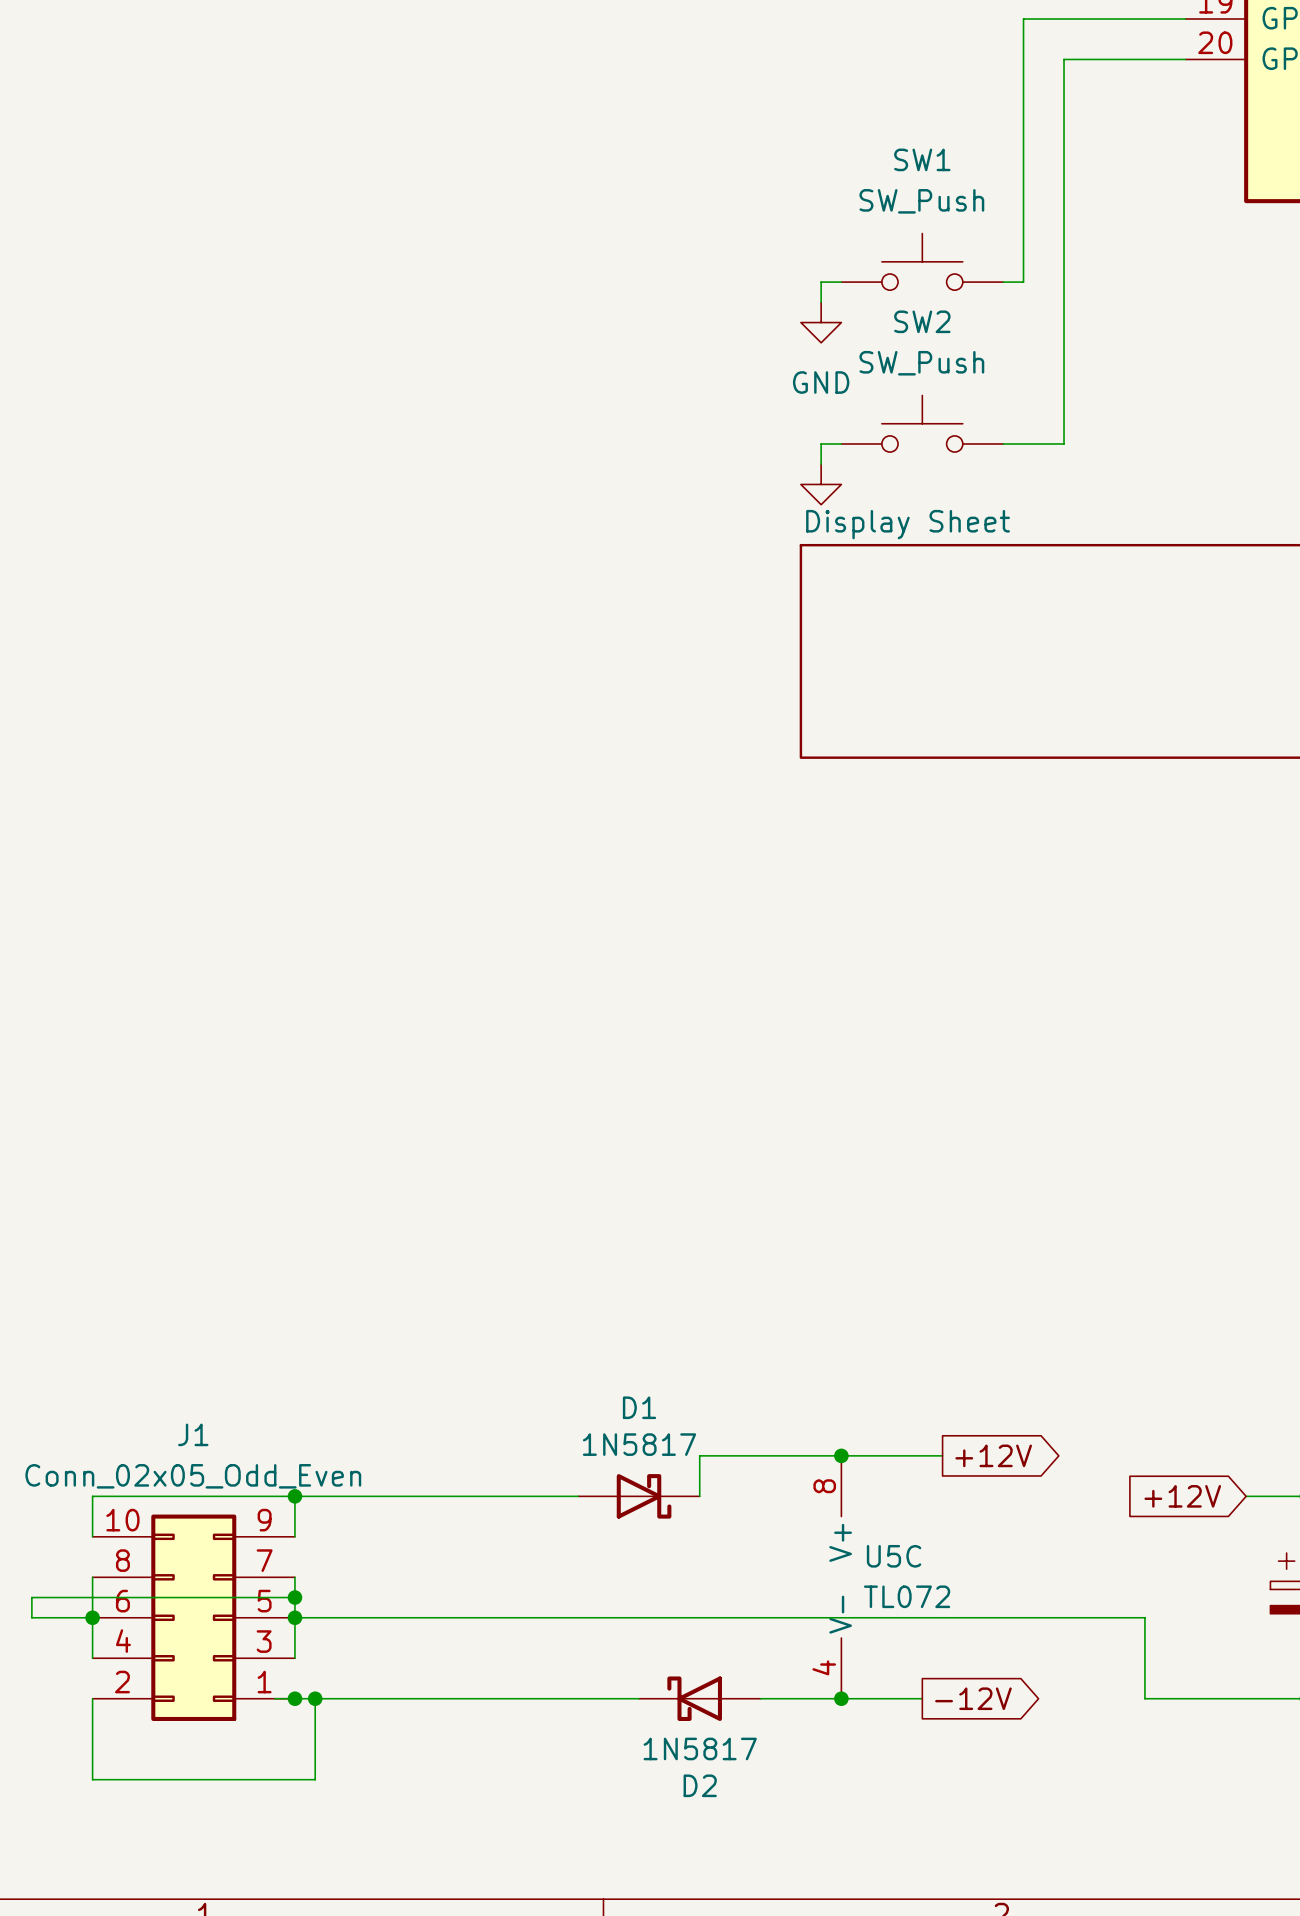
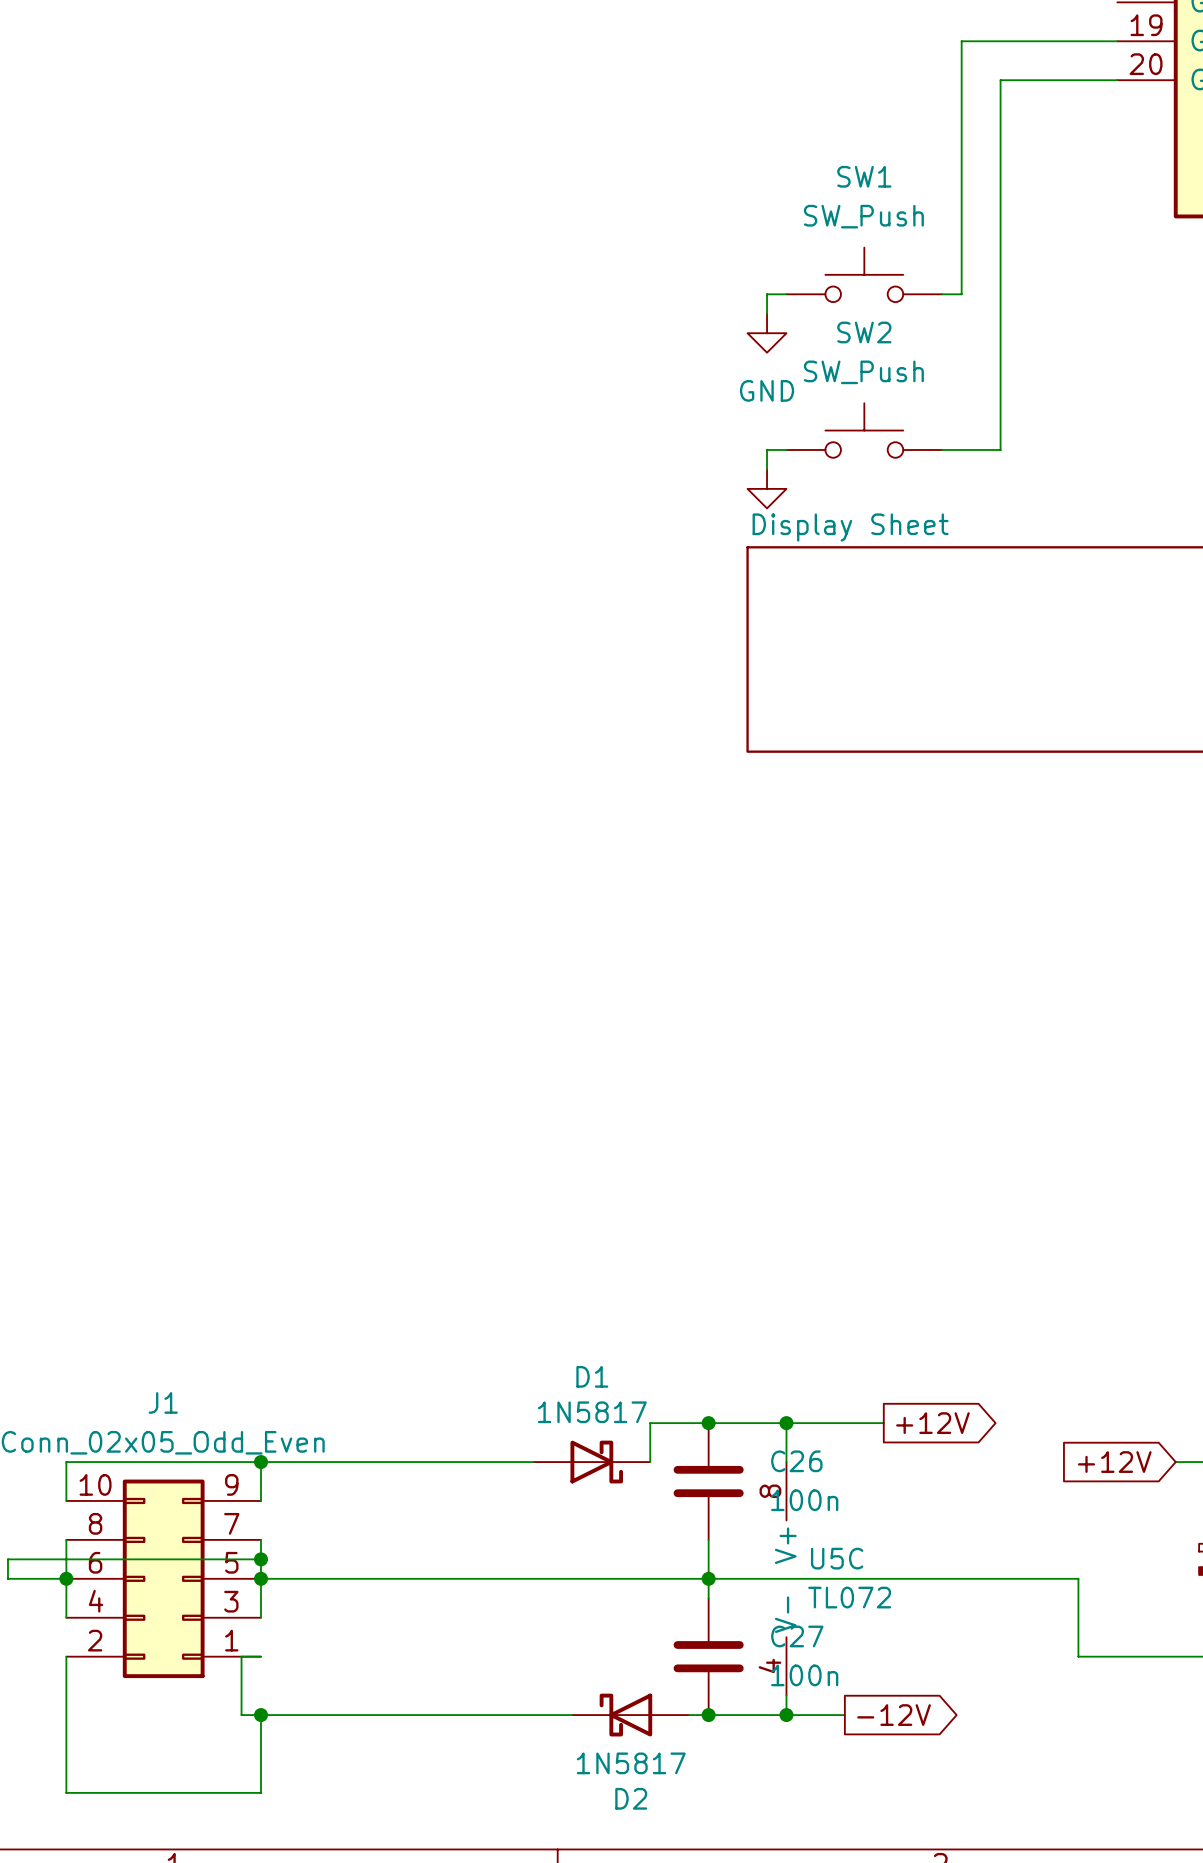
junction: none -> (708, 1423)
C26: none -> 100n (708, 1481)
wire: none -> (708, 1539) (708, 1598)
U5C position: (841, 1577) -> (786, 1578)
junction: none -> (708, 1578)
wire: none -> (241, 1656) (241, 1715) (572, 1715)
wire: (294, 1698) (639, 1698) -> none
junction: (294, 1698) -> none
wire: (315, 1698) (315, 1779) (92, 1779) -> (261, 1715) (261, 1792) (66, 1792) (66, 1734)
junction: (315, 1698) -> none
D2 position: (699, 1698) -> (630, 1715)
wire: (760, 1698) (922, 1698) -> (689, 1715) (844, 1715)
C27: none -> 100n (708, 1656)
junction: (841, 1698) -> none
global label position: -12V (973, 1698) -> -12V (894, 1715)
wire: none -> (786, 1695) (786, 1715)
junction: none -> (261, 1715)
junction: none -> (708, 1715)
junction: none -> (786, 1715)

